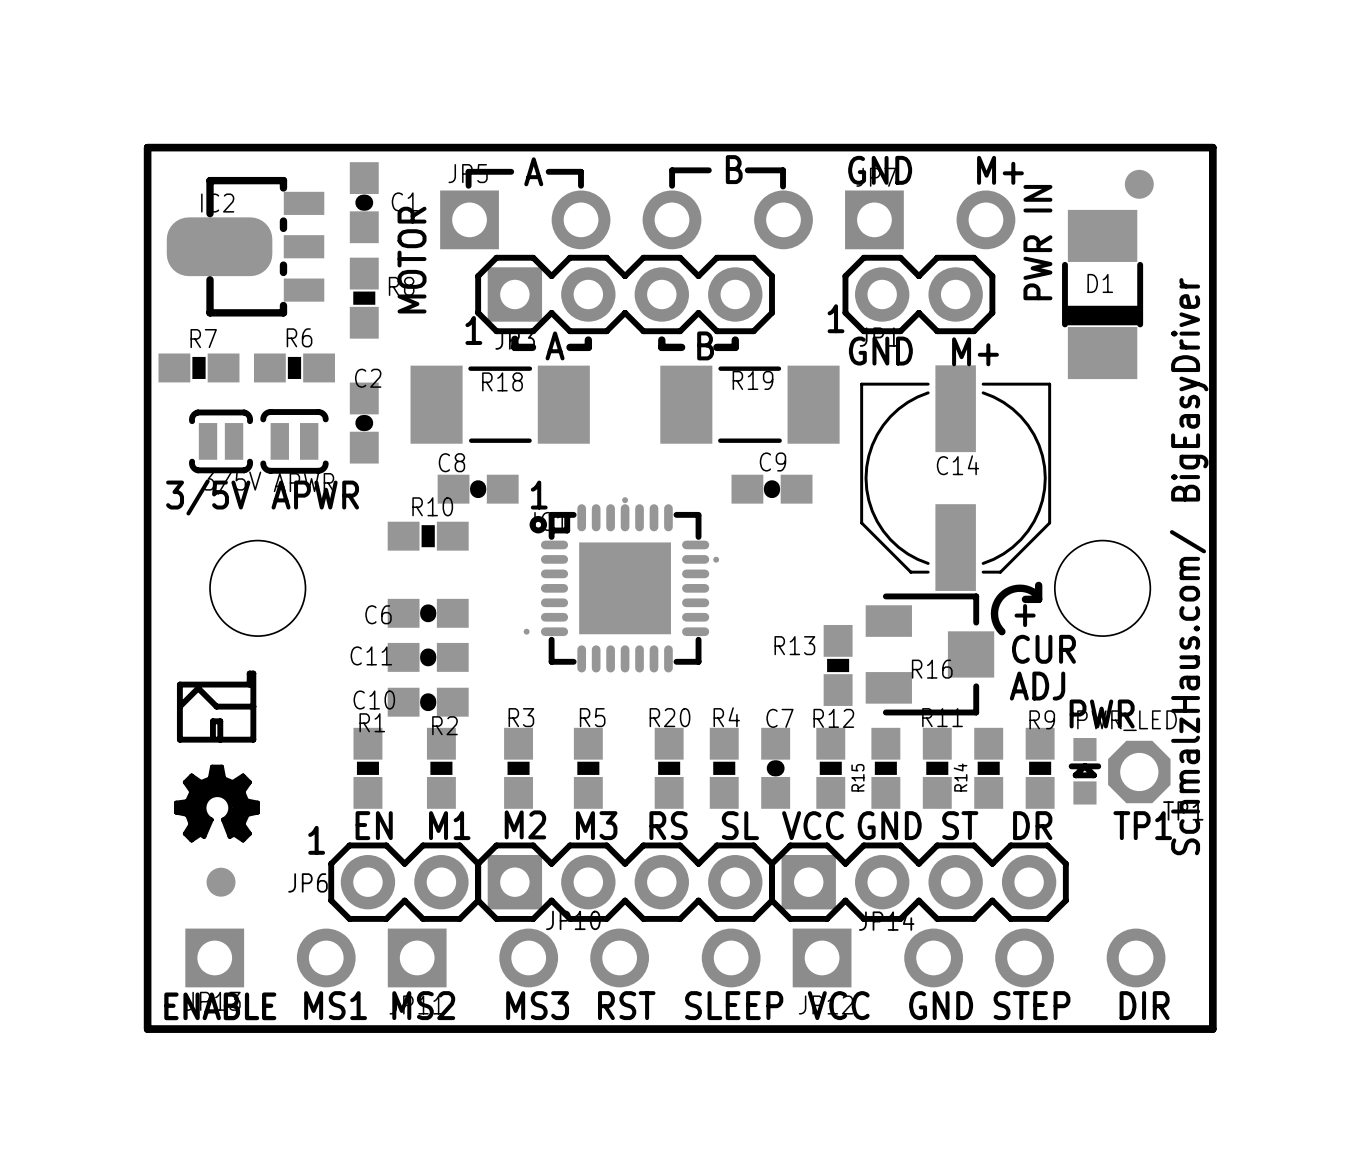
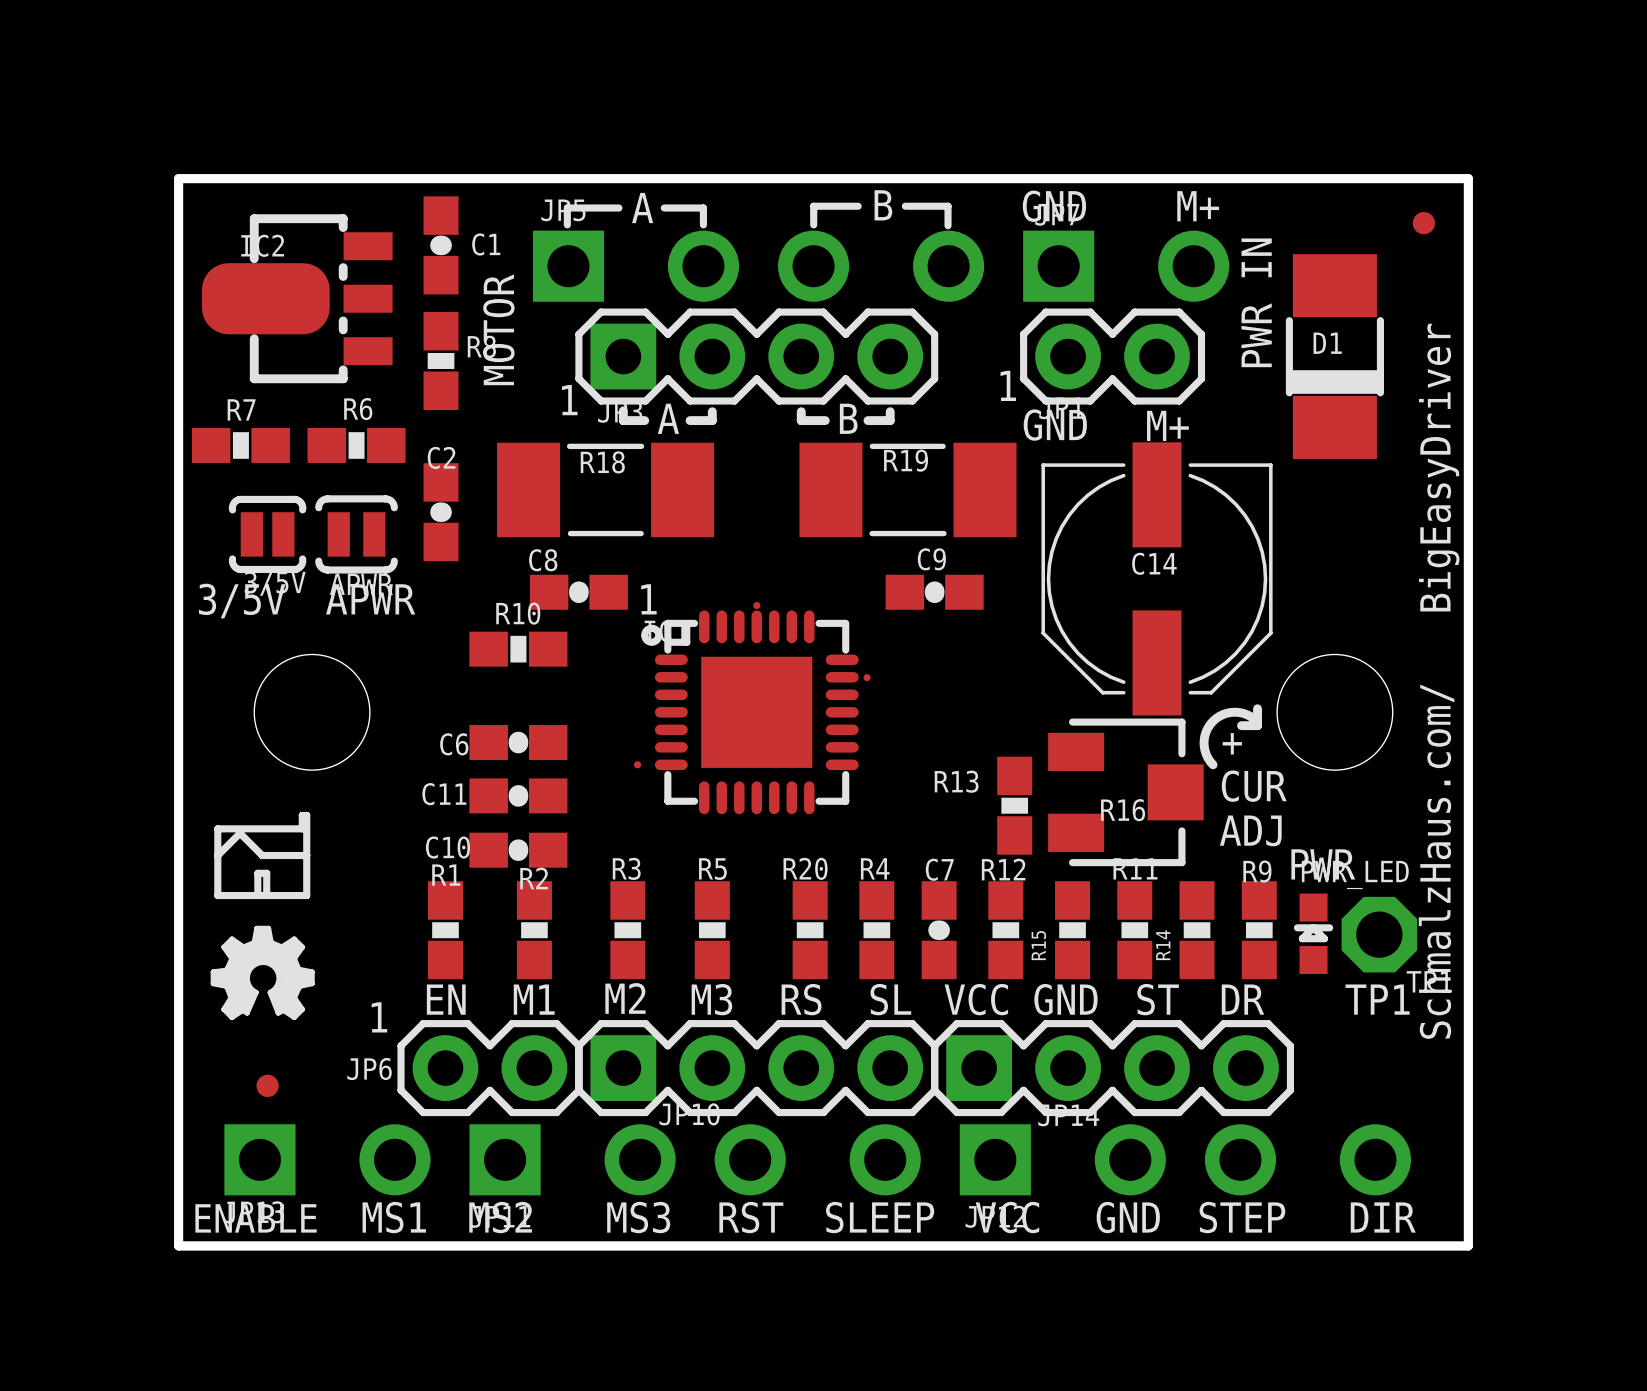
part: (1139, 184) -> none
part: none -> (1423, 223)
part footprint: [206, 867, 236, 897] -> [256, 1074, 279, 1097]

